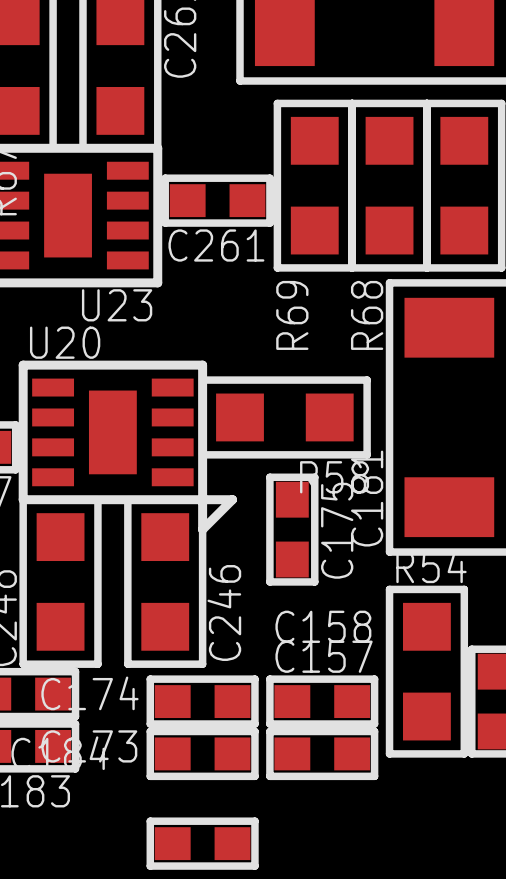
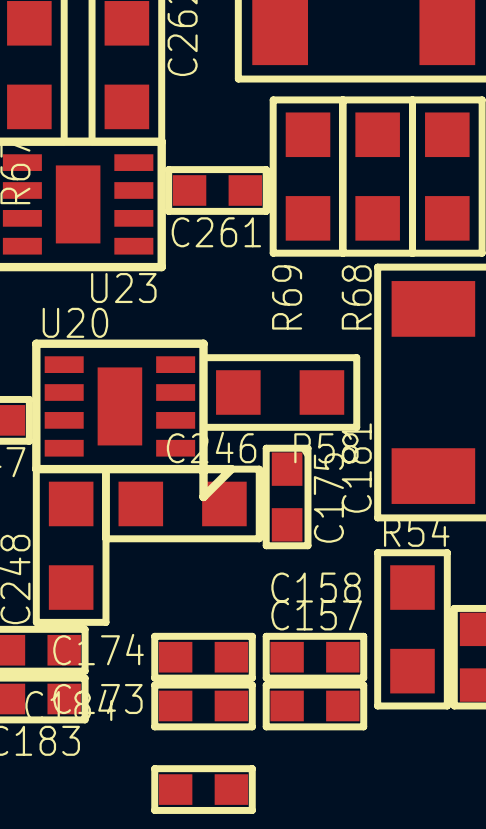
C246 rotation: 0° (165, 581) -> 90° clockwise (182, 503)

